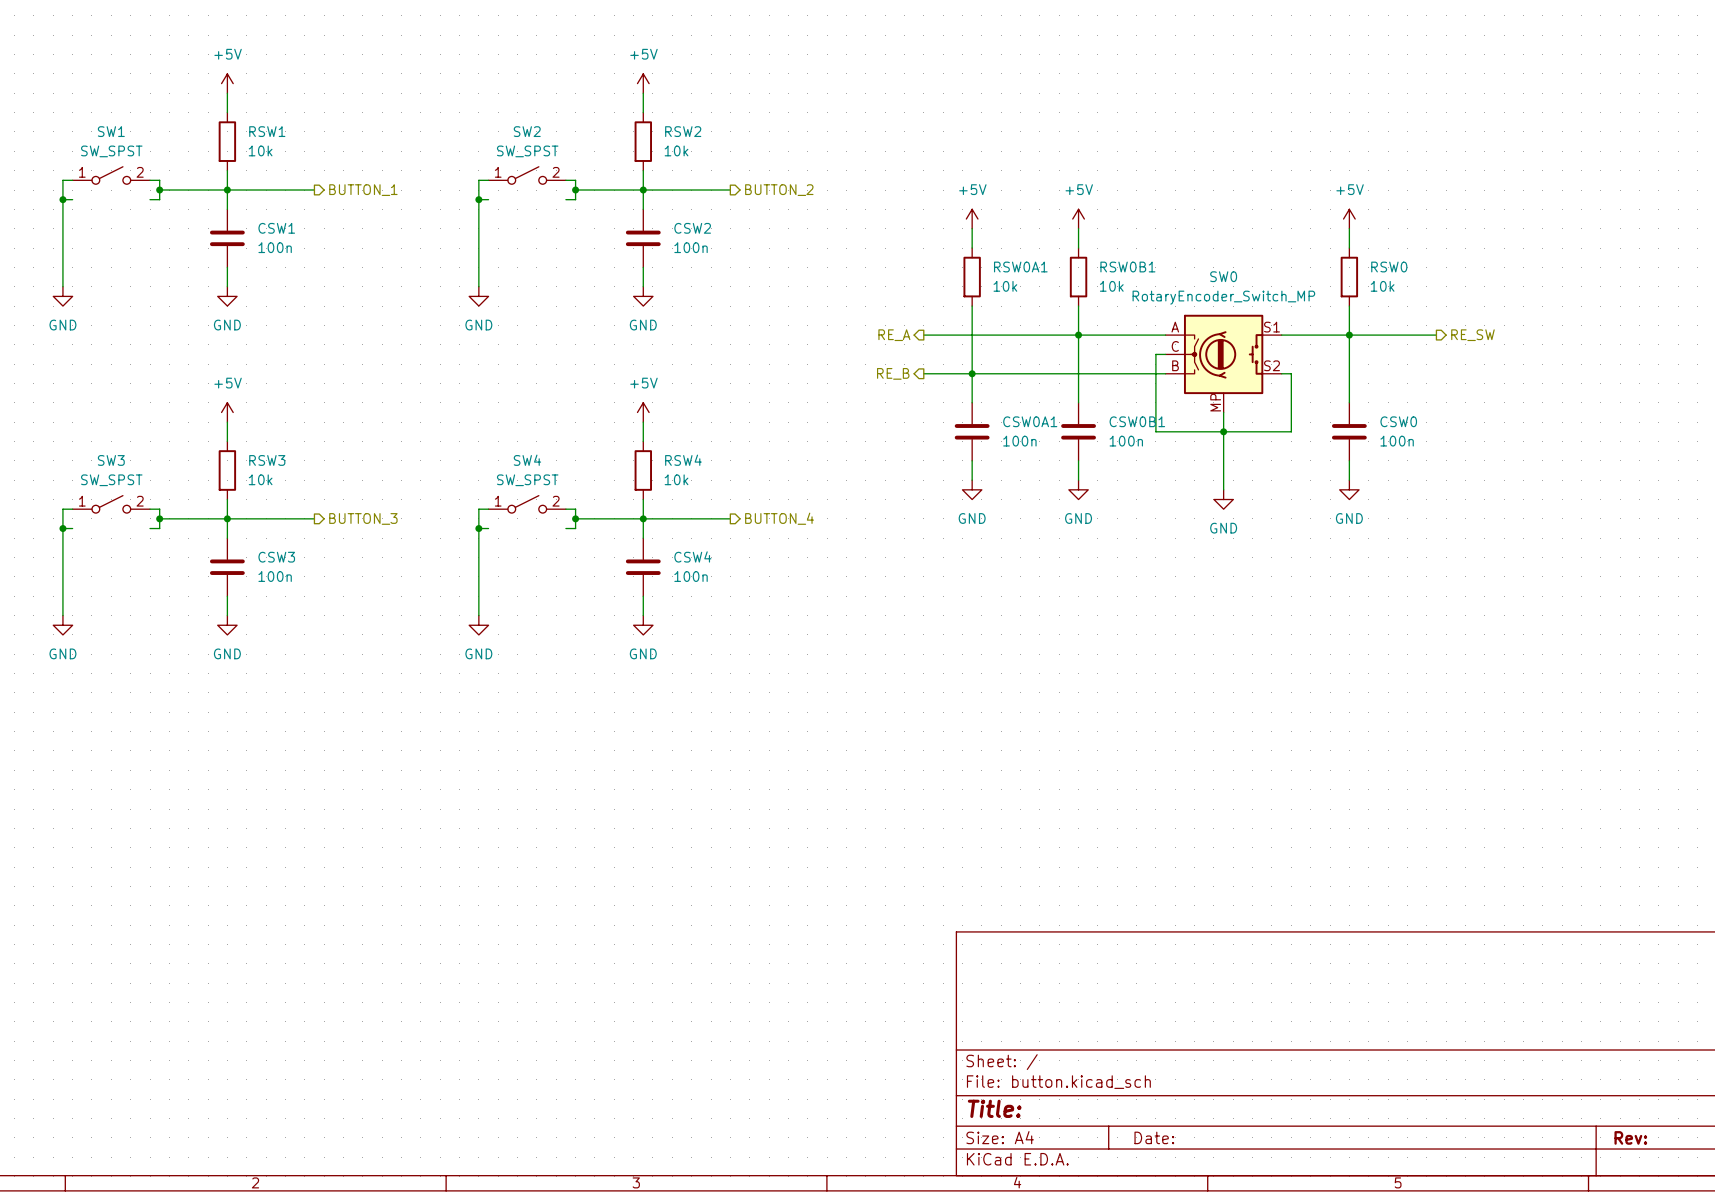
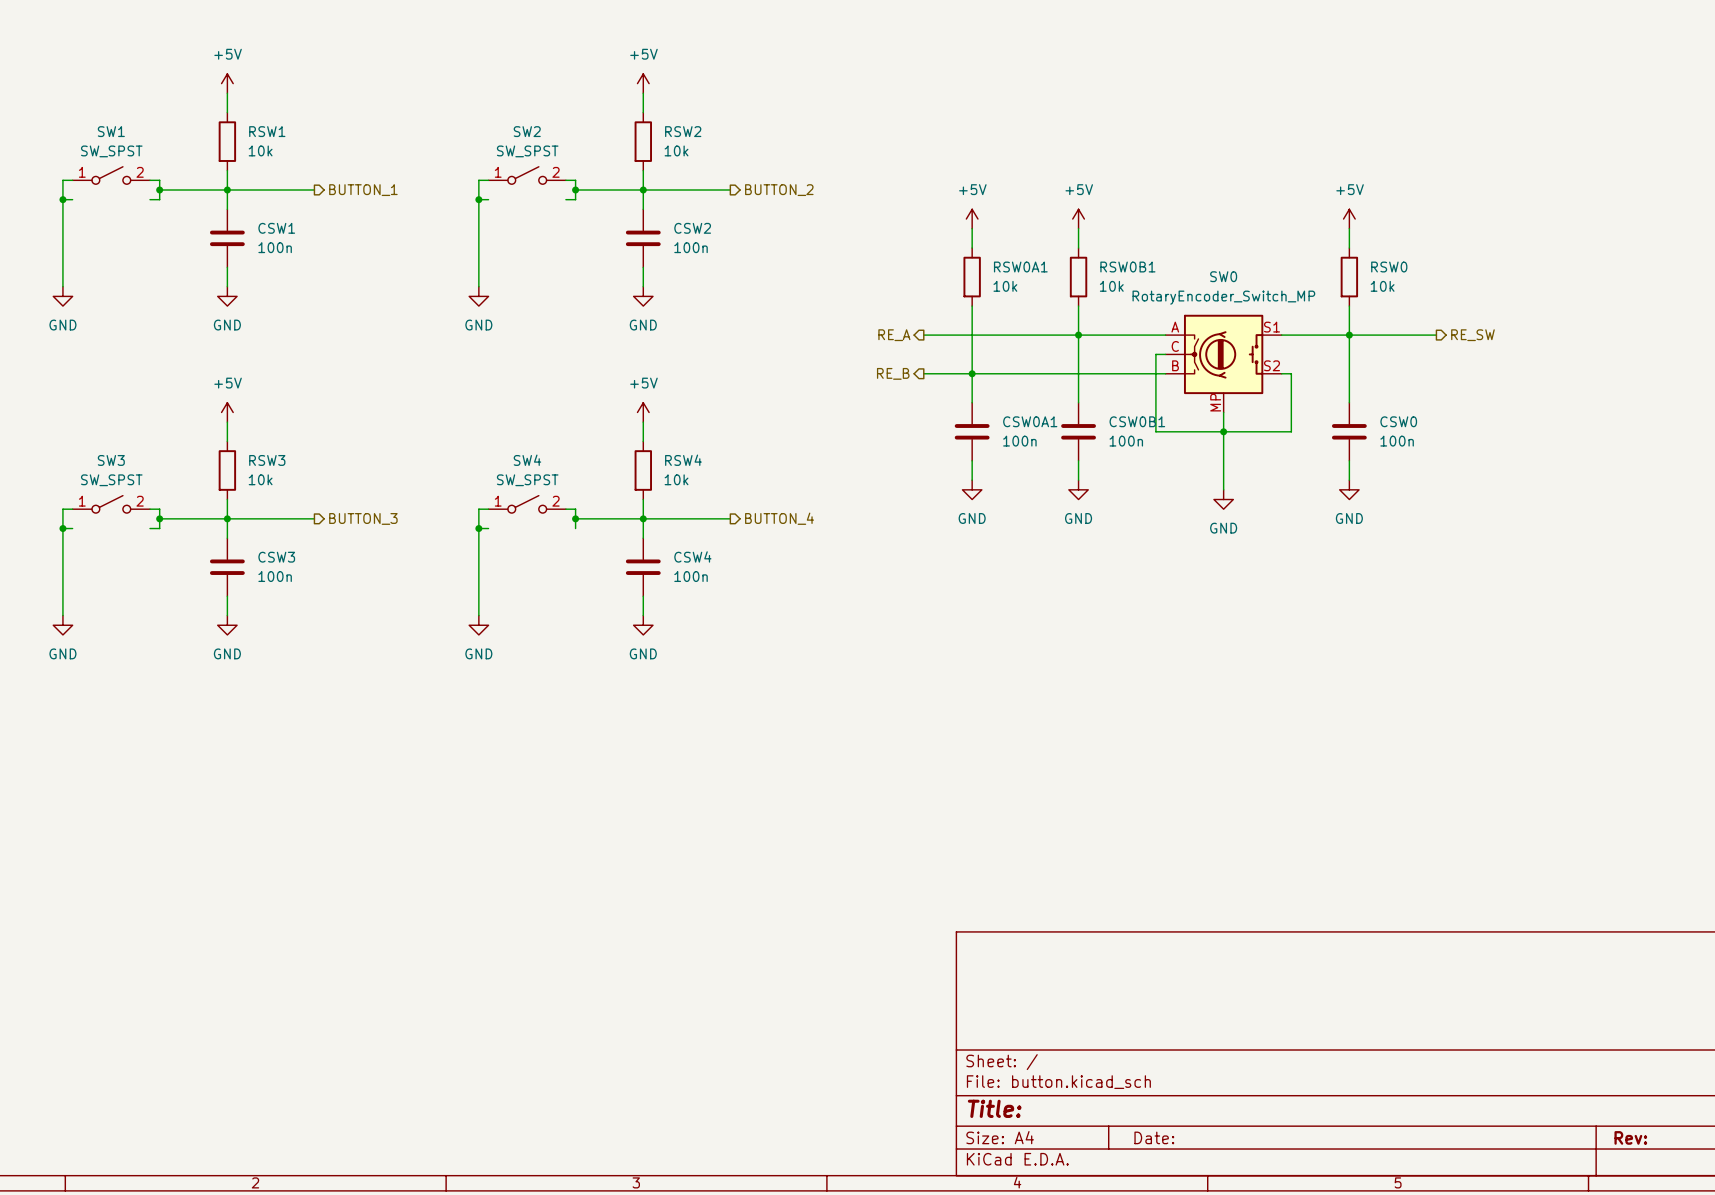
wire: (565, 528) (575, 528) -> none

